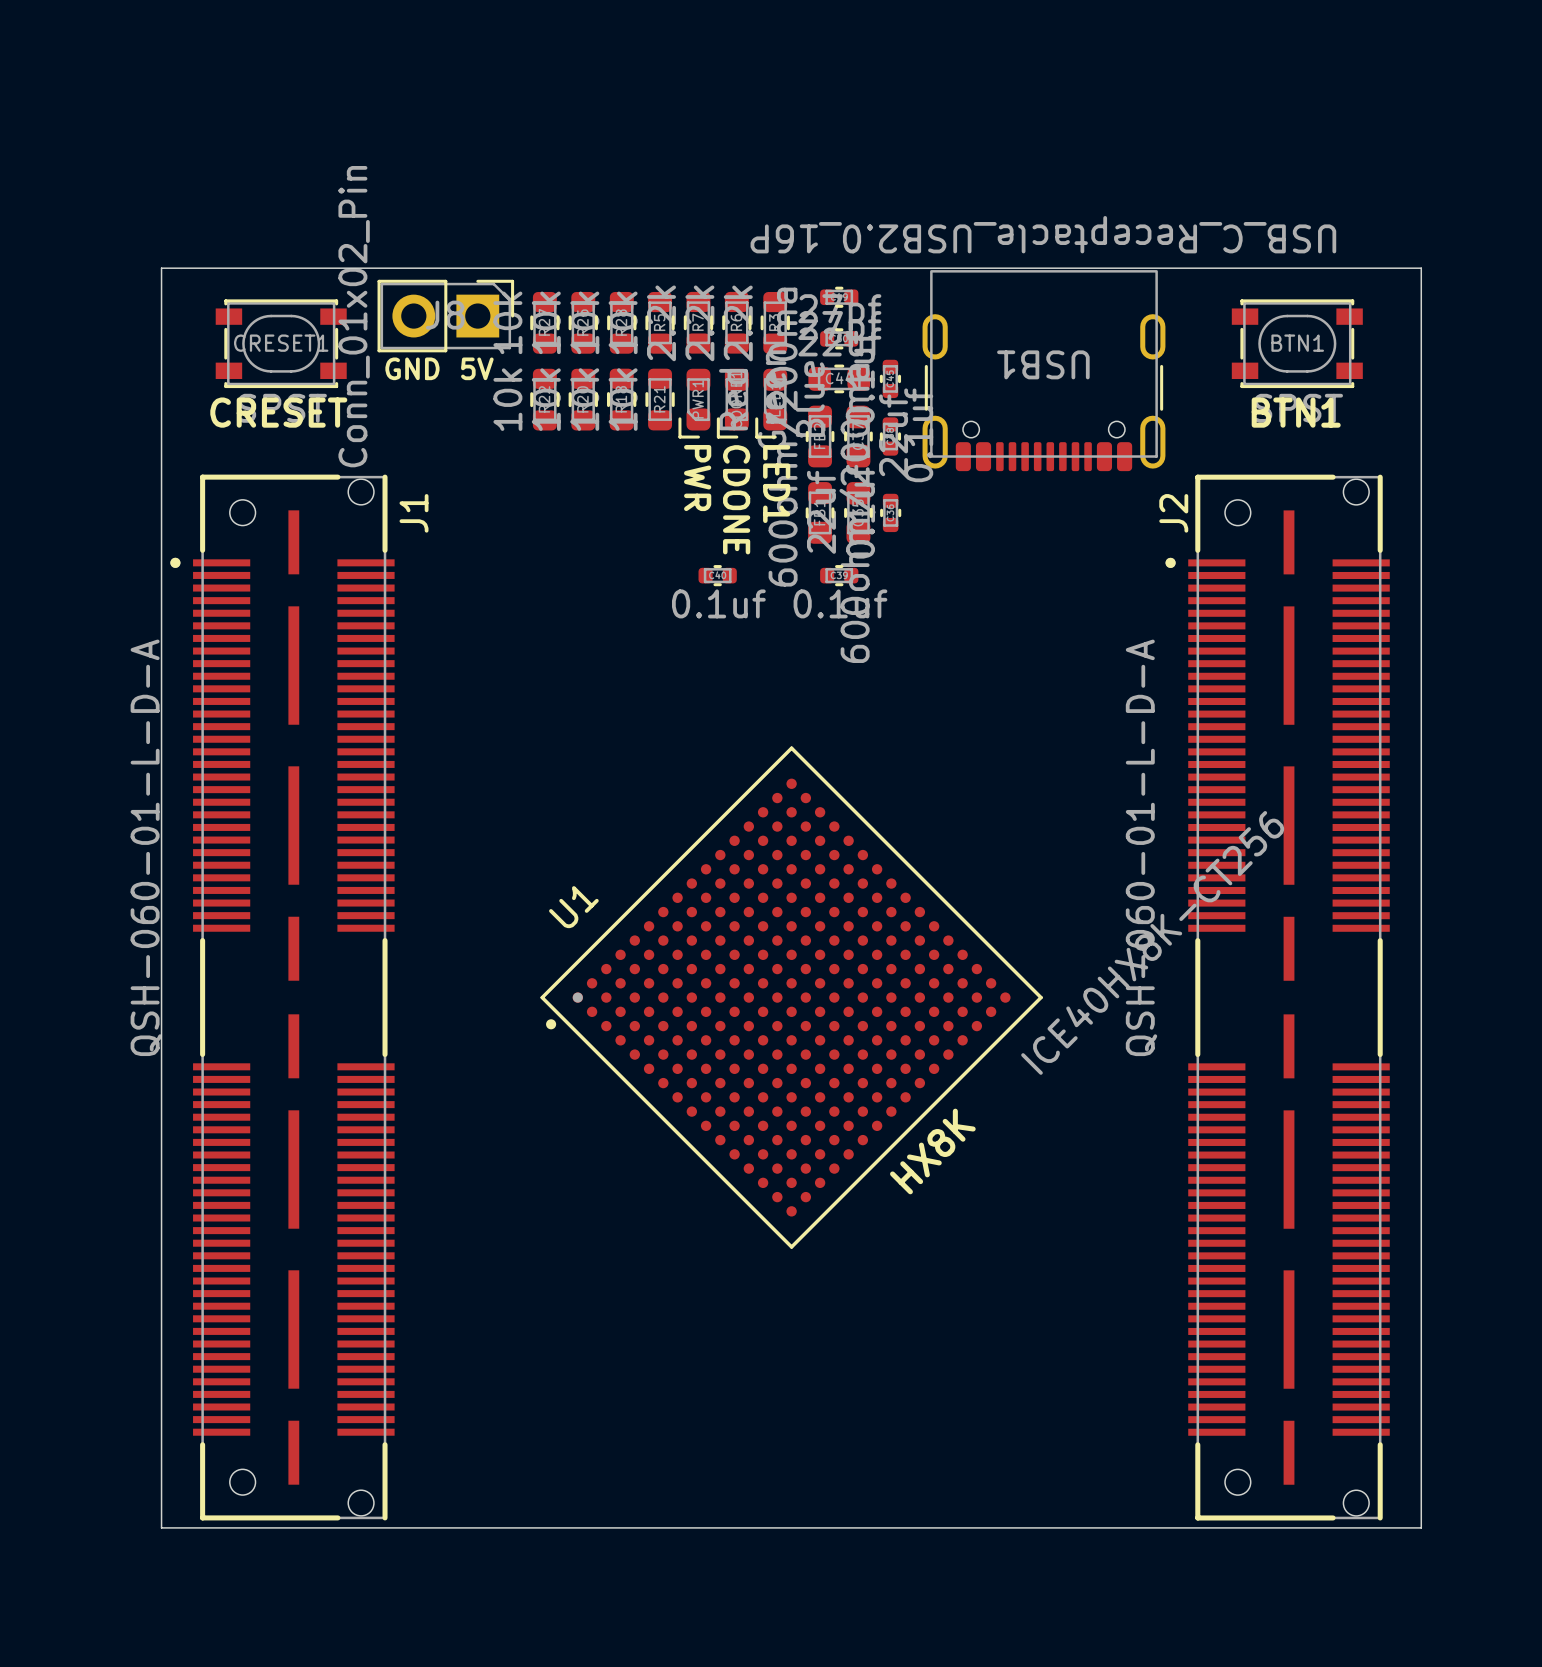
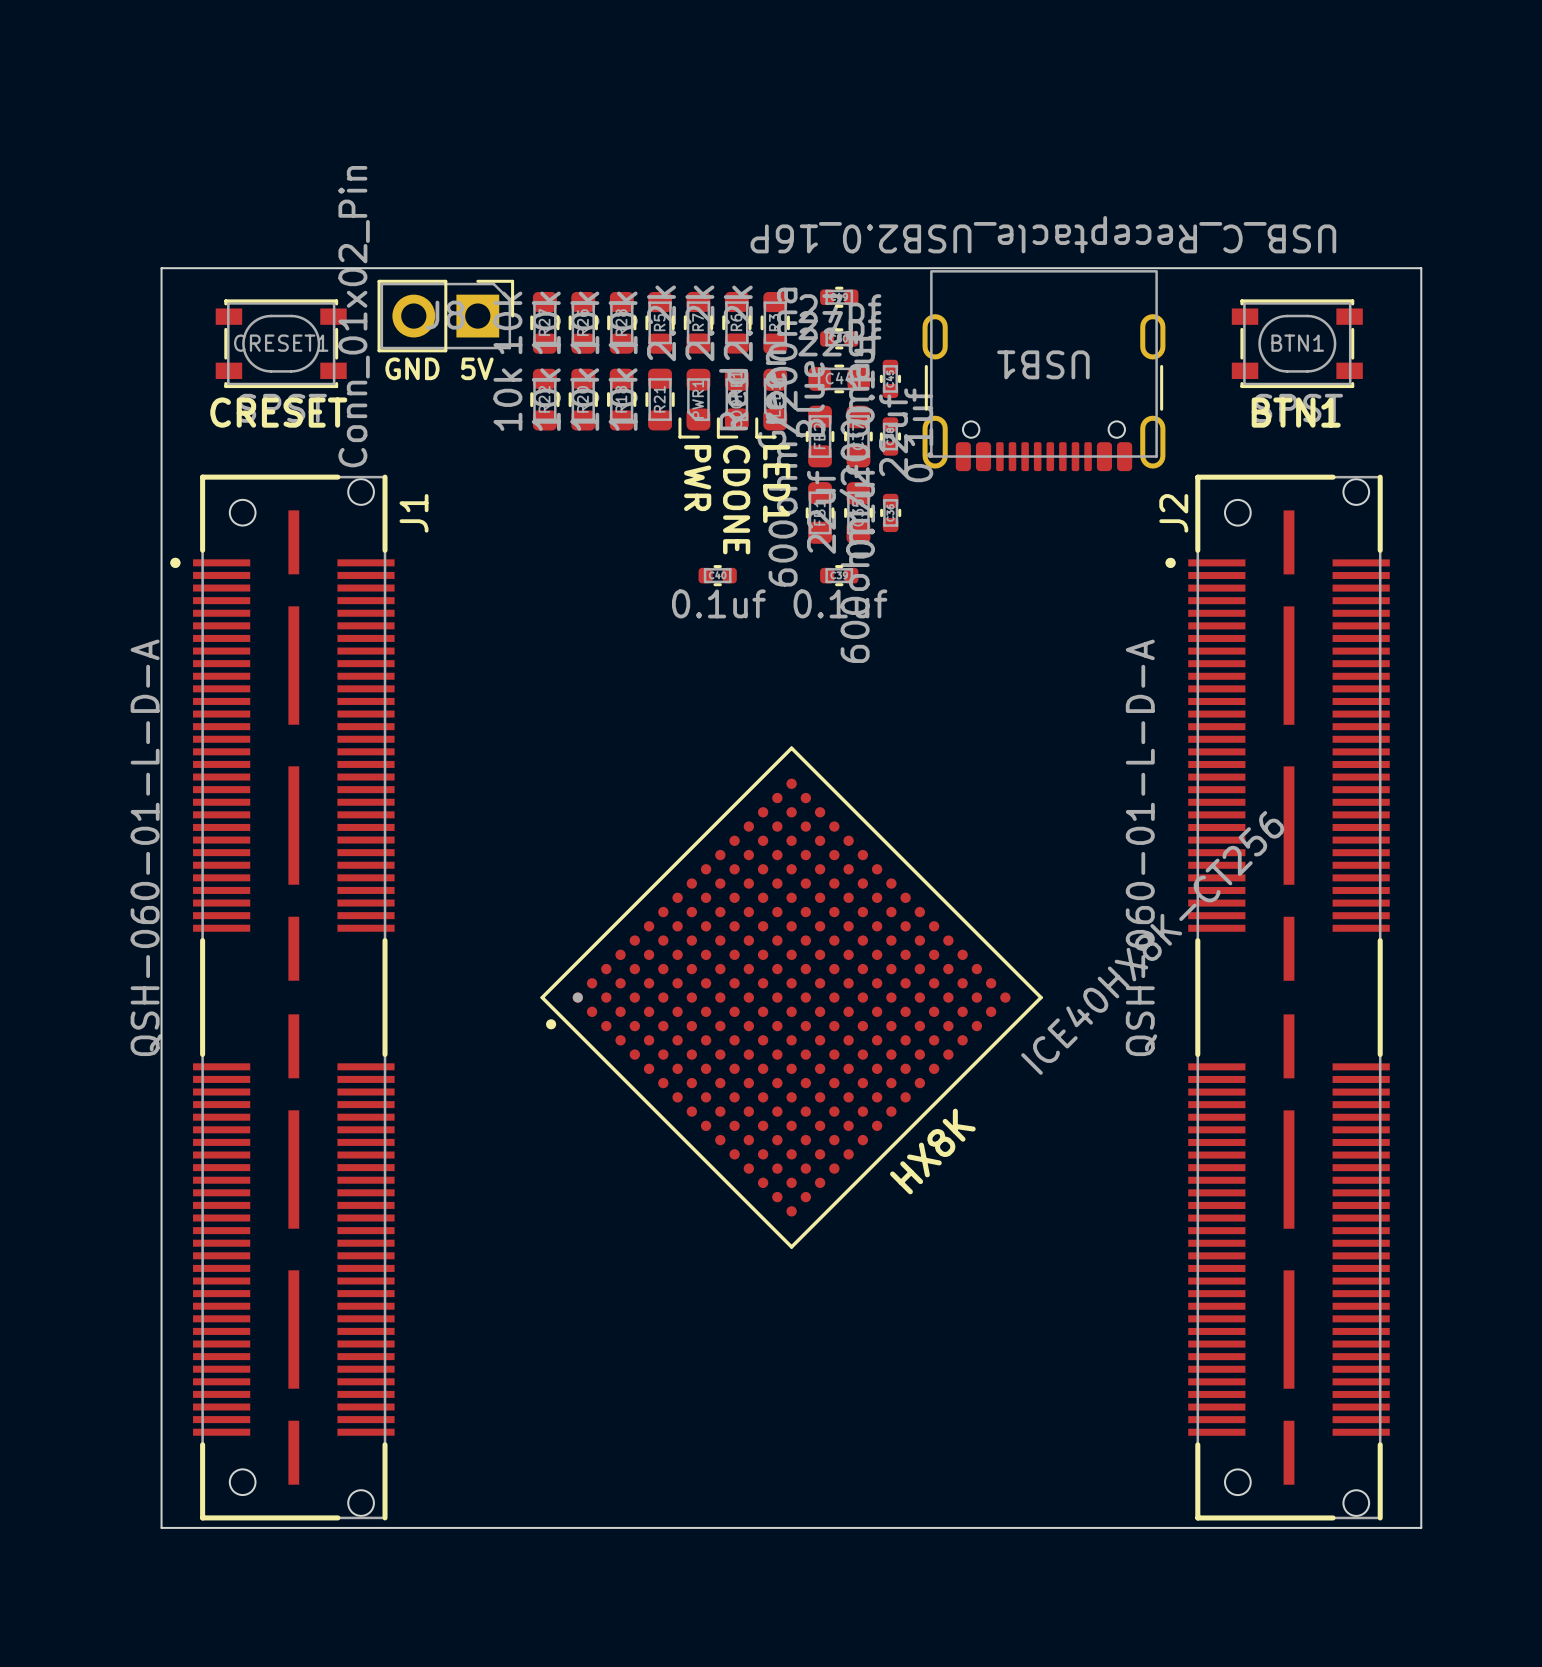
U1 name: U1 (573, 907) -> none

